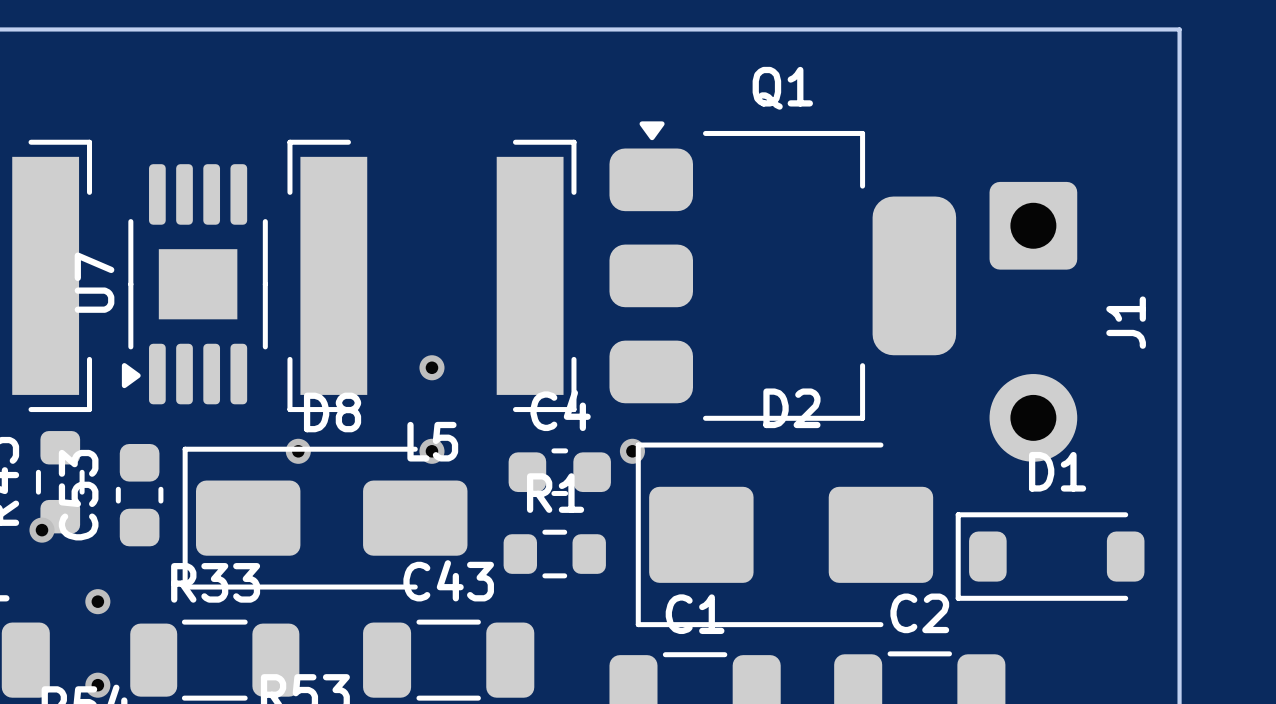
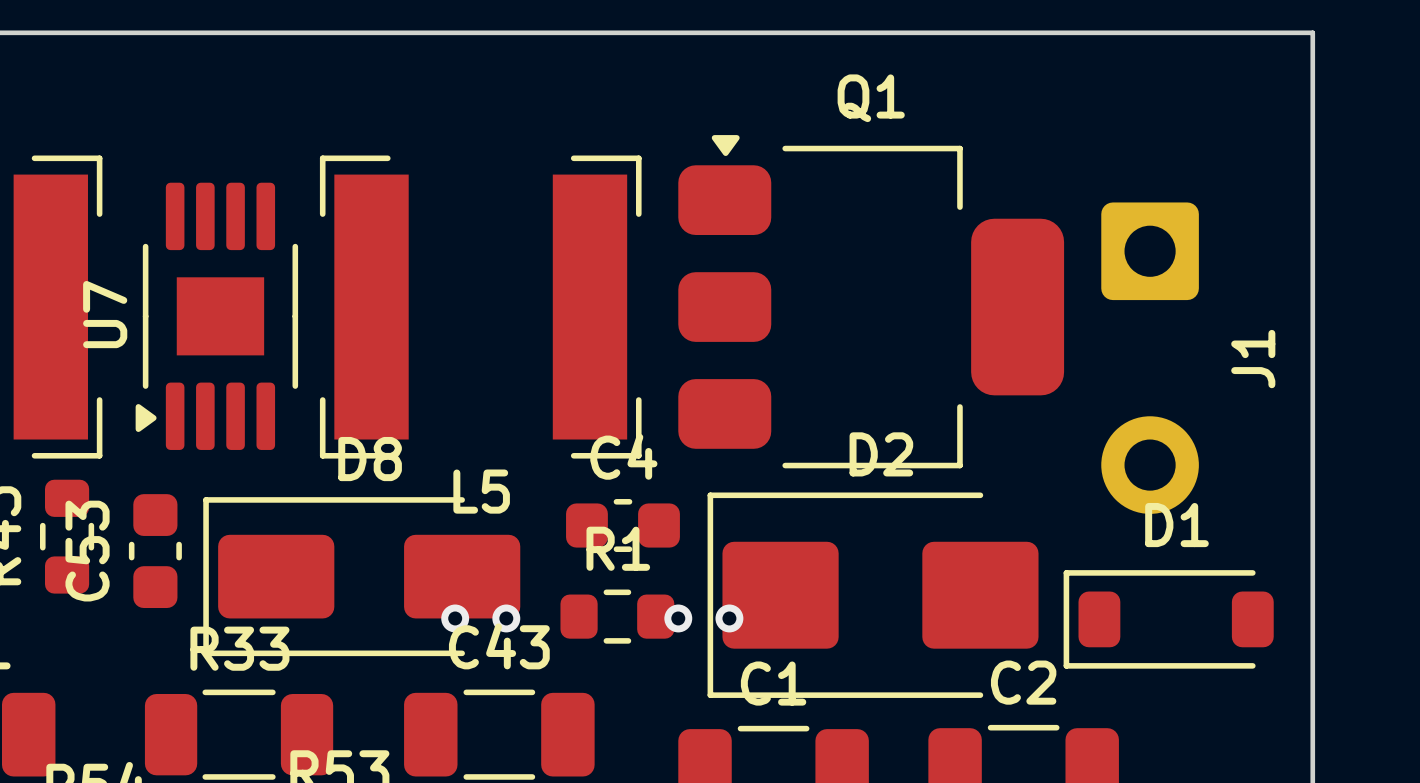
via: (431, 367) -> none
via: (298, 451) -> none
via: (431, 451) -> none
via: (632, 451) -> none
via: (41, 530) -> none
via: none -> (455, 618)
via: none -> (506, 618)
via: none -> (678, 618)
via: none -> (729, 618)
via: (97, 601) -> none
via: (97, 685) -> none

